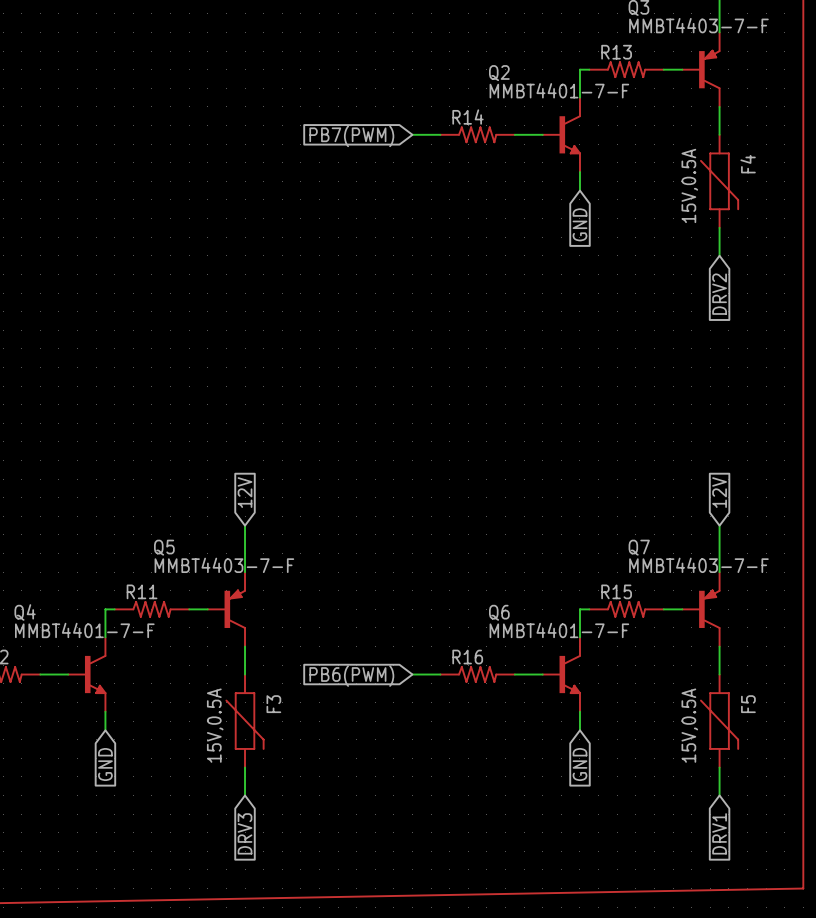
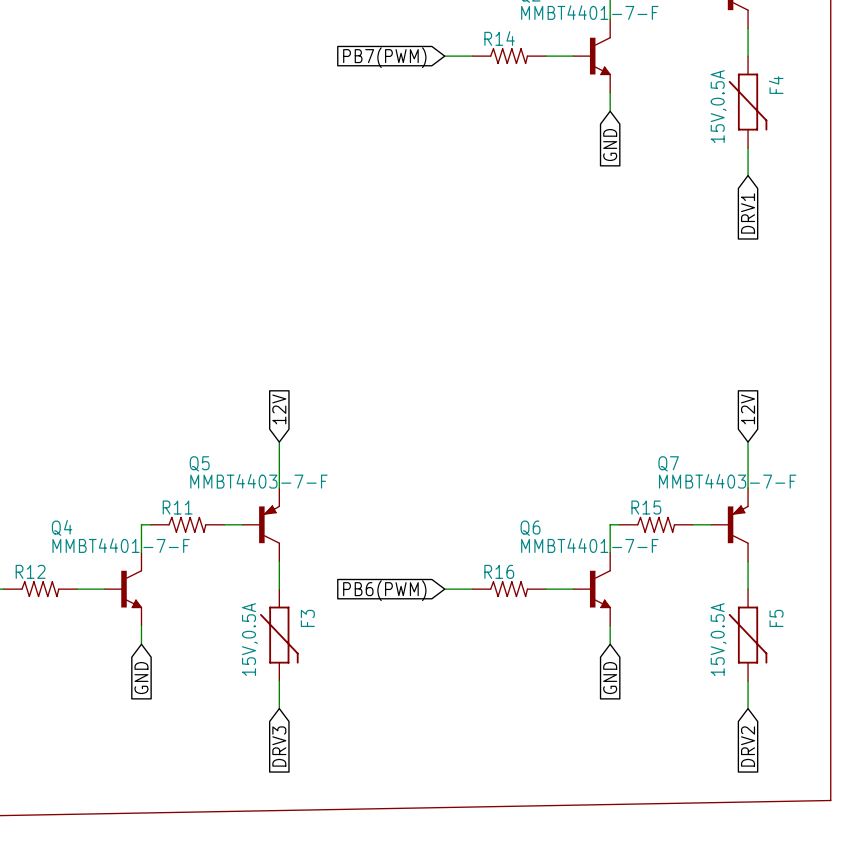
global label: DRV2 (719, 294) -> DRV1 (748, 213)
global label: DRV1 (719, 833) -> DRV2 (748, 746)

